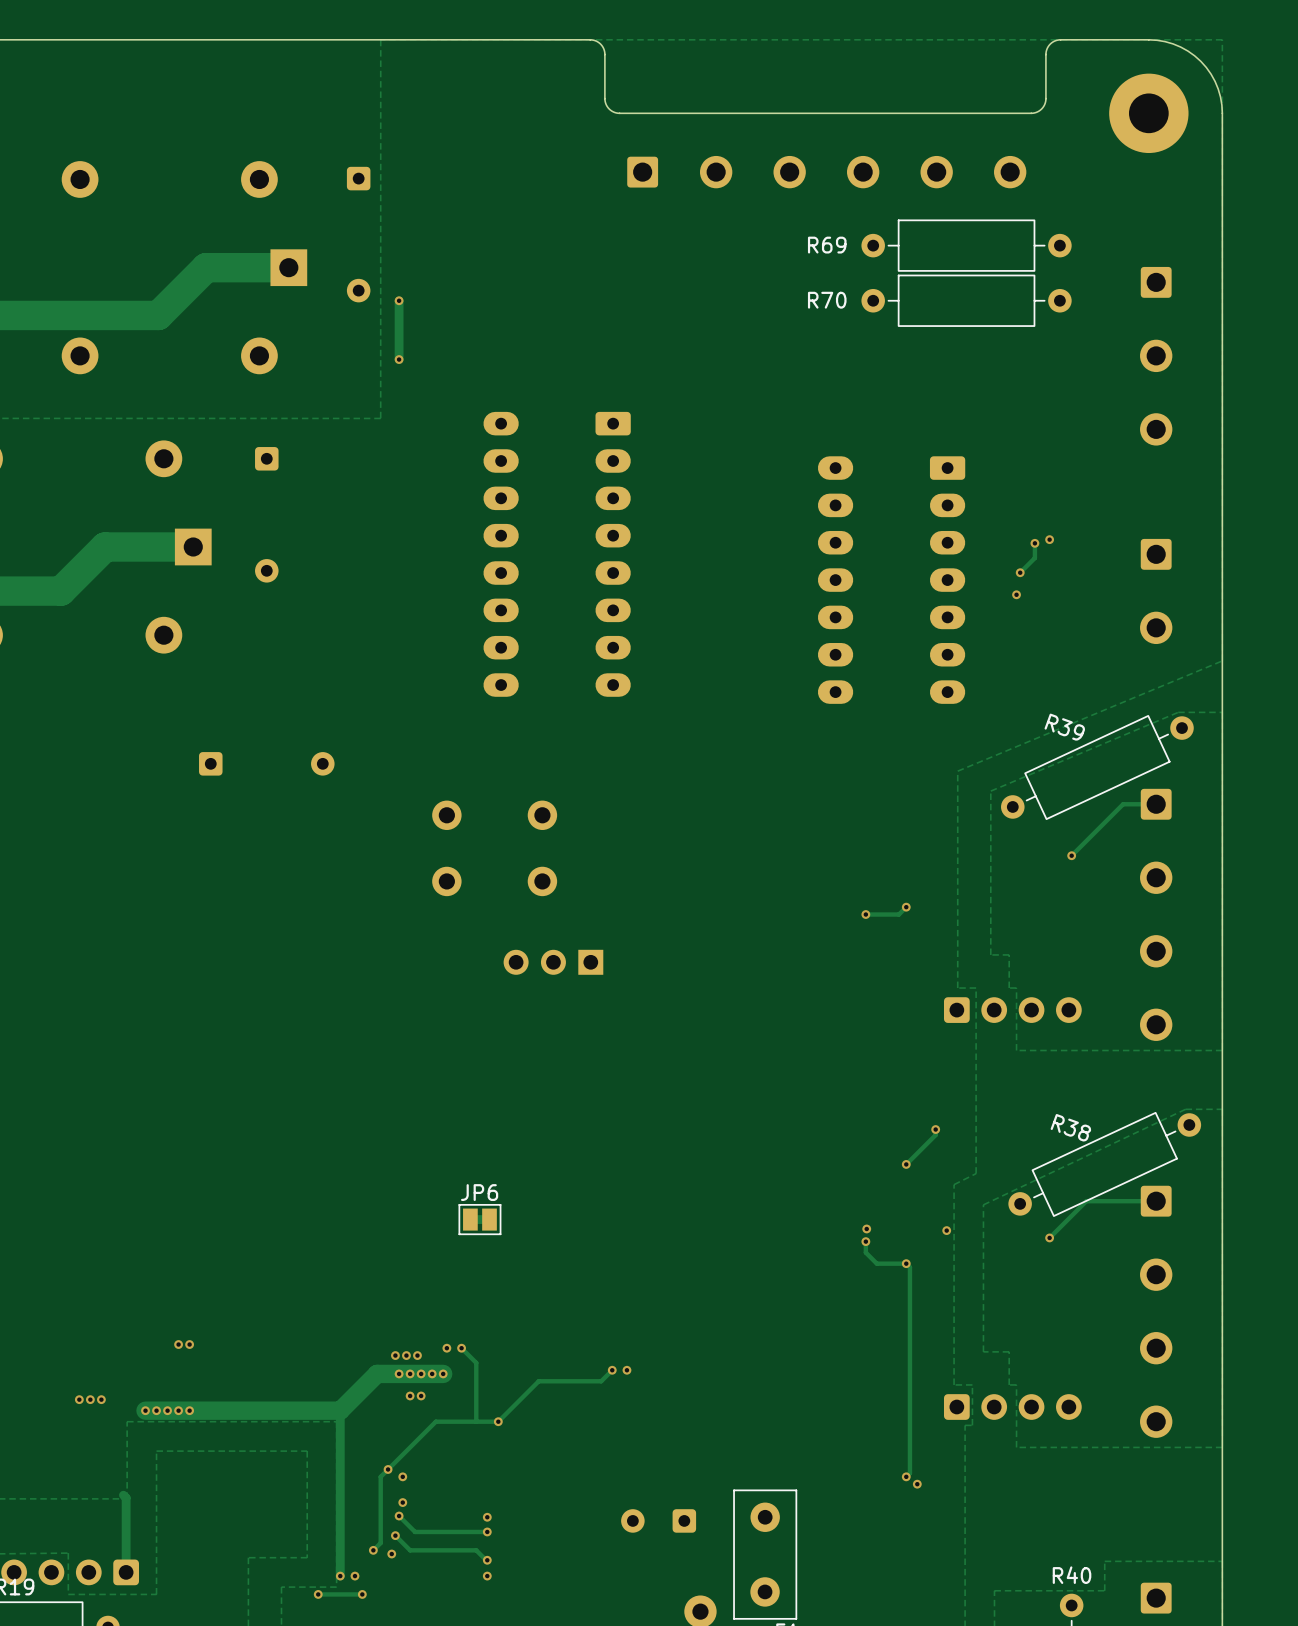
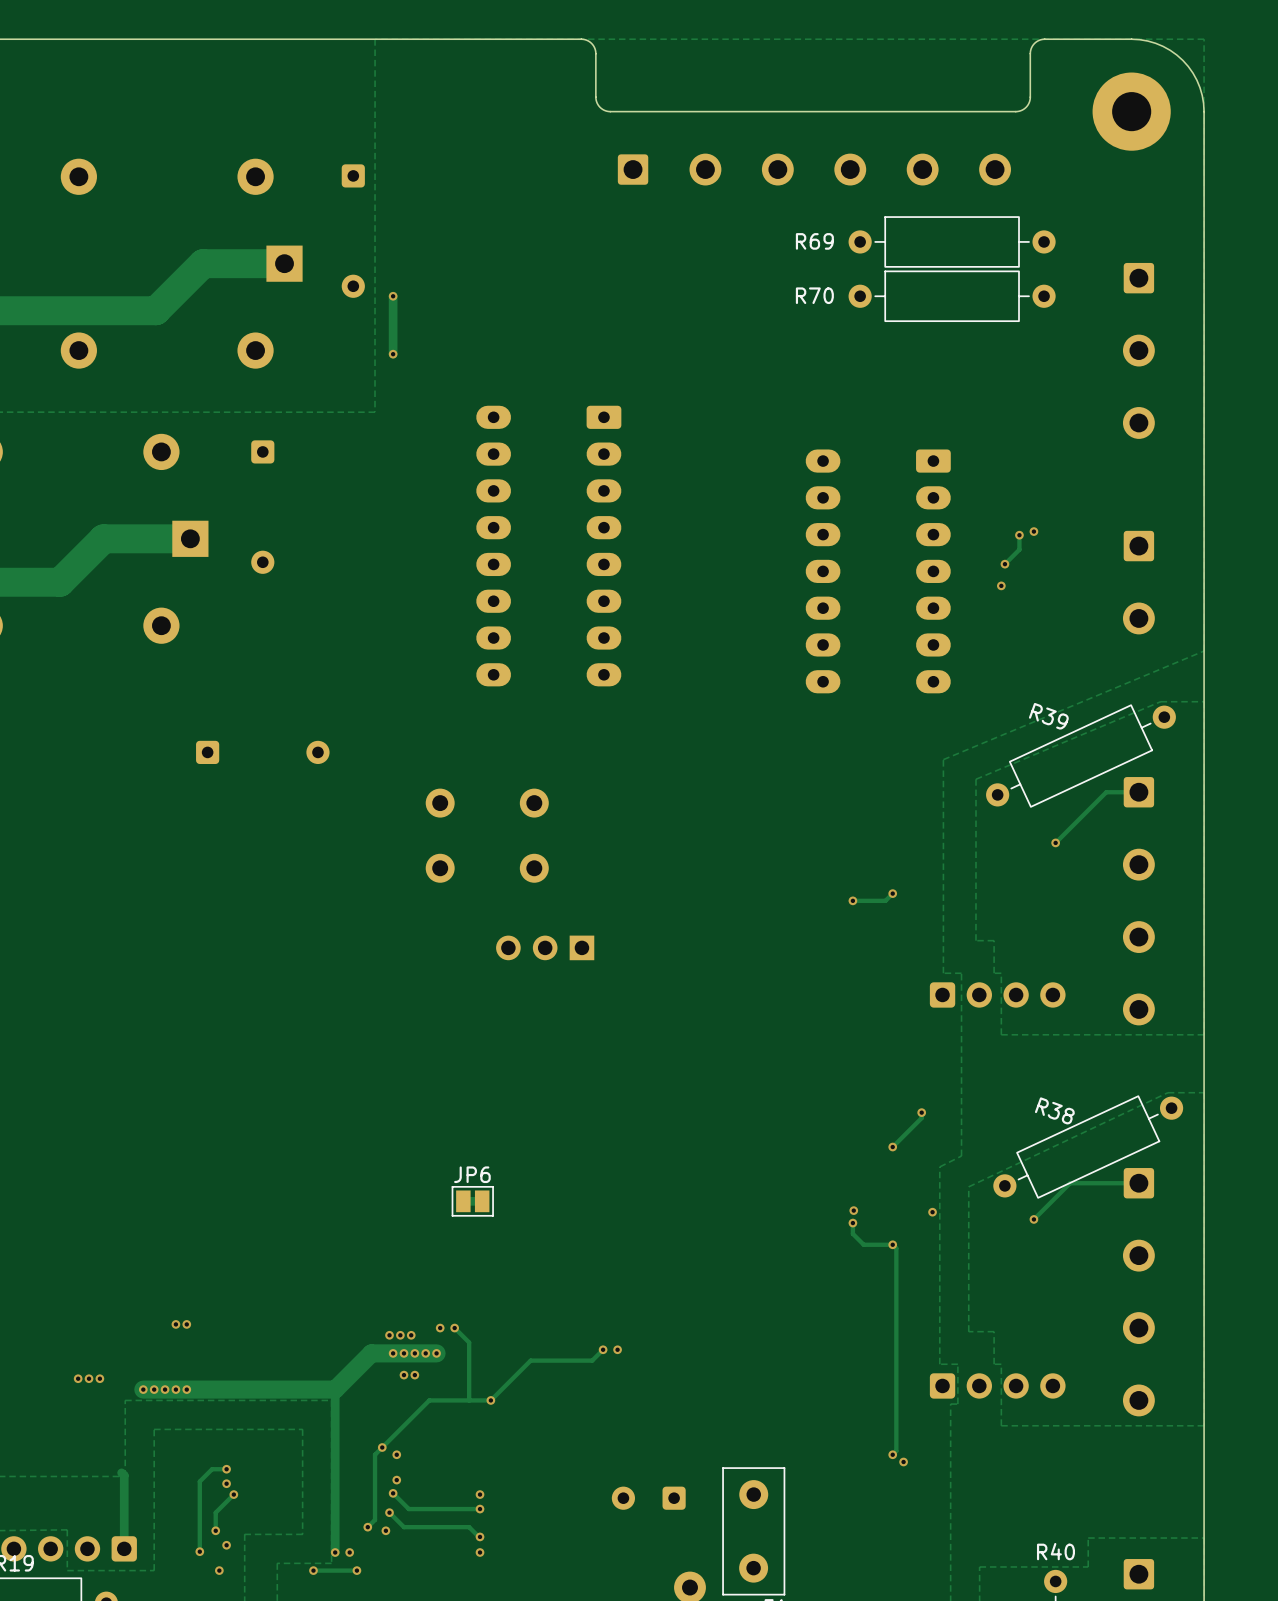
track: none -> (226, 1469) (212, 1469) (199, 1481) (199, 1551)
via: none -> (226, 1469)
via: none -> (226, 1483)
track: none -> (233, 1494) (215, 1512) (215, 1530)
via: none -> (233, 1494)
via: none -> (215, 1530)
via: none -> (226, 1545)
via: none -> (199, 1551)
via: none -> (219, 1570)

